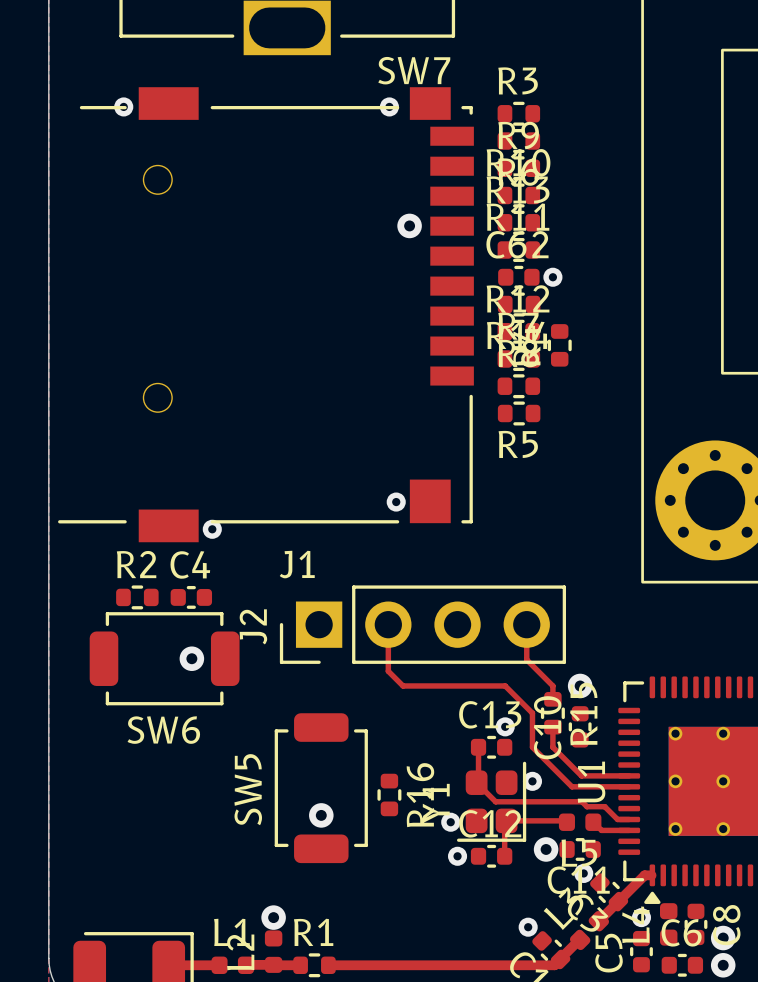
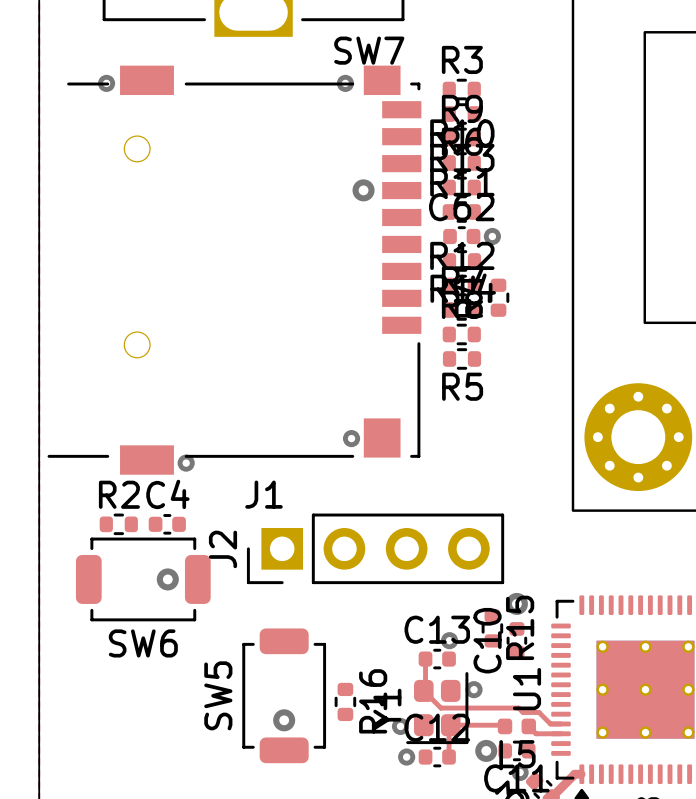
top track: (388, 624) (388, 671) (403, 685) (505, 685) (532, 713) (532, 747) (571, 786) (629, 786) -> none
top track: (526, 624) (526, 659) (552, 685) (552, 699) -> none
top track: (552, 727) (552, 747) (581, 775) (629, 775) -> none

